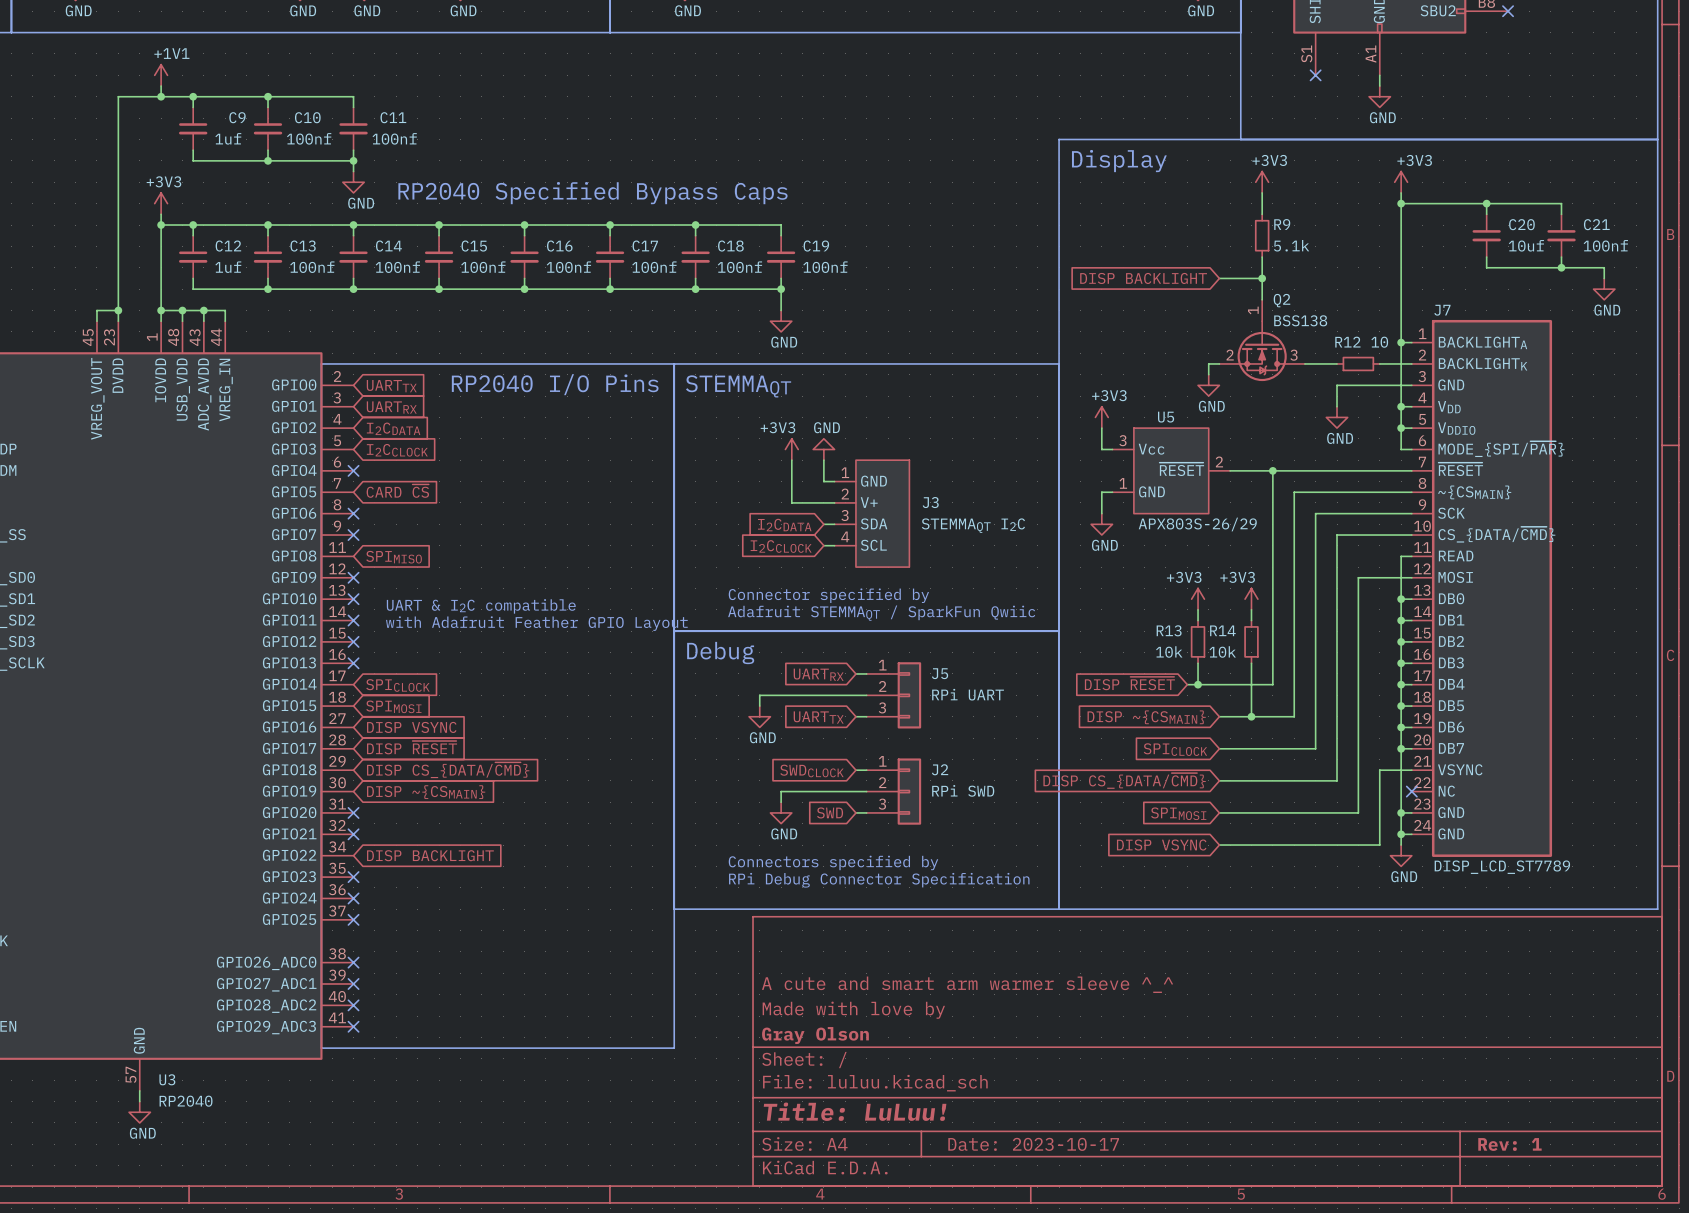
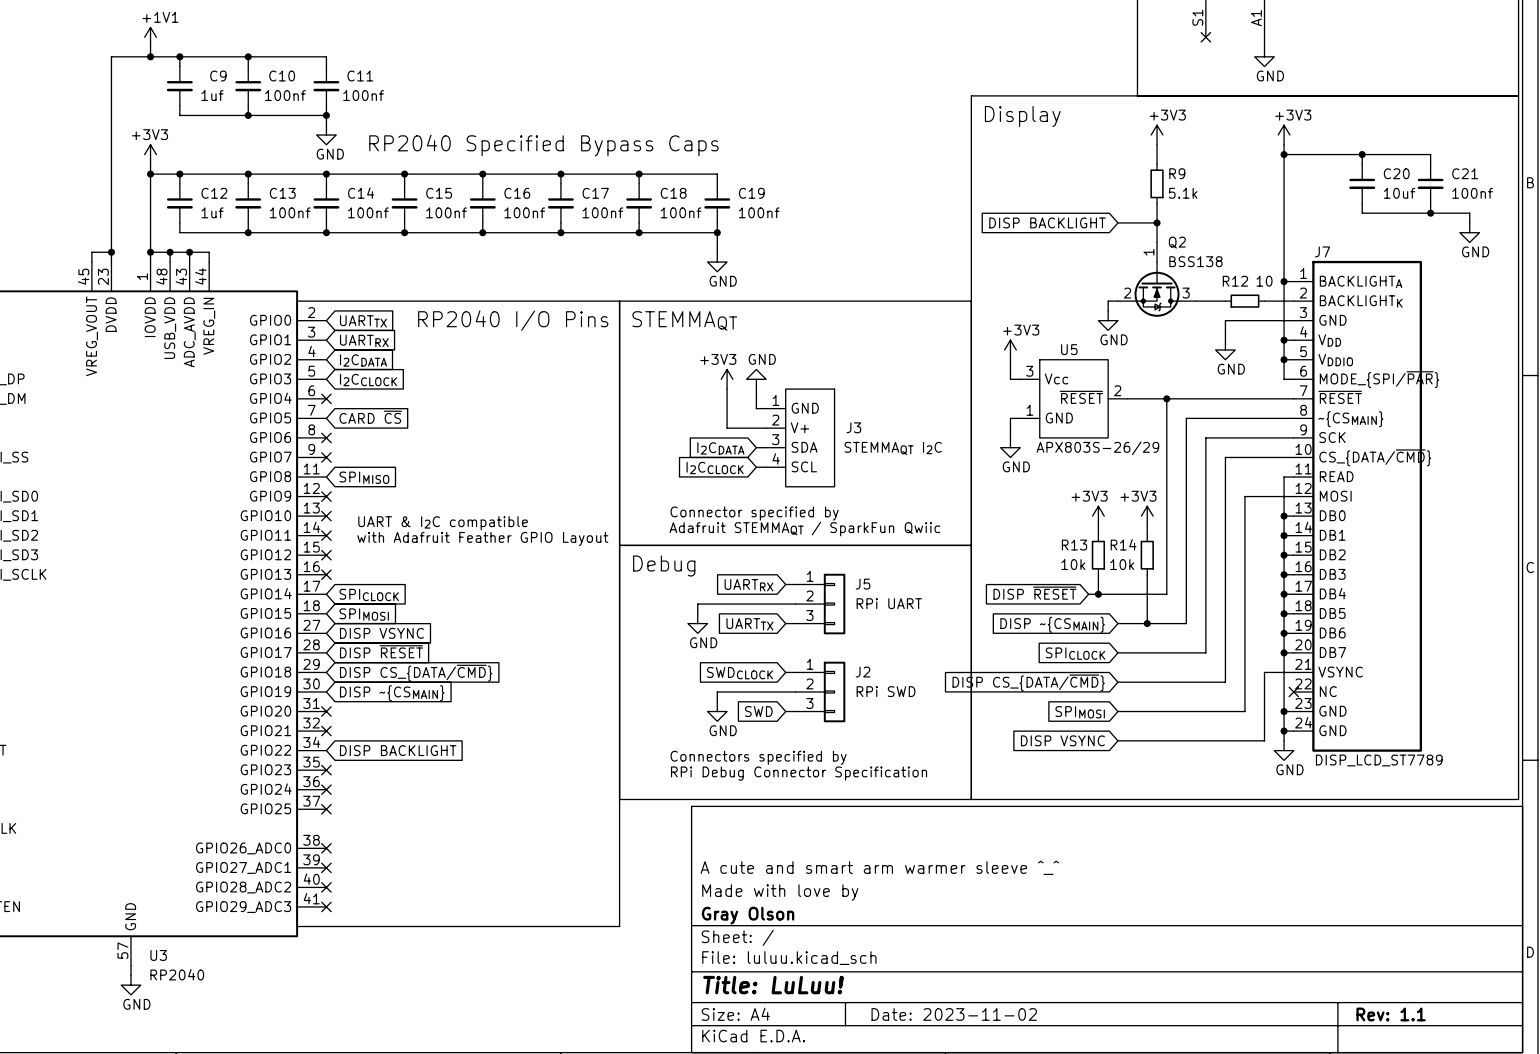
title block: Date: 2023-10-17 (1033, 1144) -> Date: 2023-11-02 (954, 1014)
title block: Rev: 1 (1509, 1144) -> Rev: 1.1 (1391, 1014)

